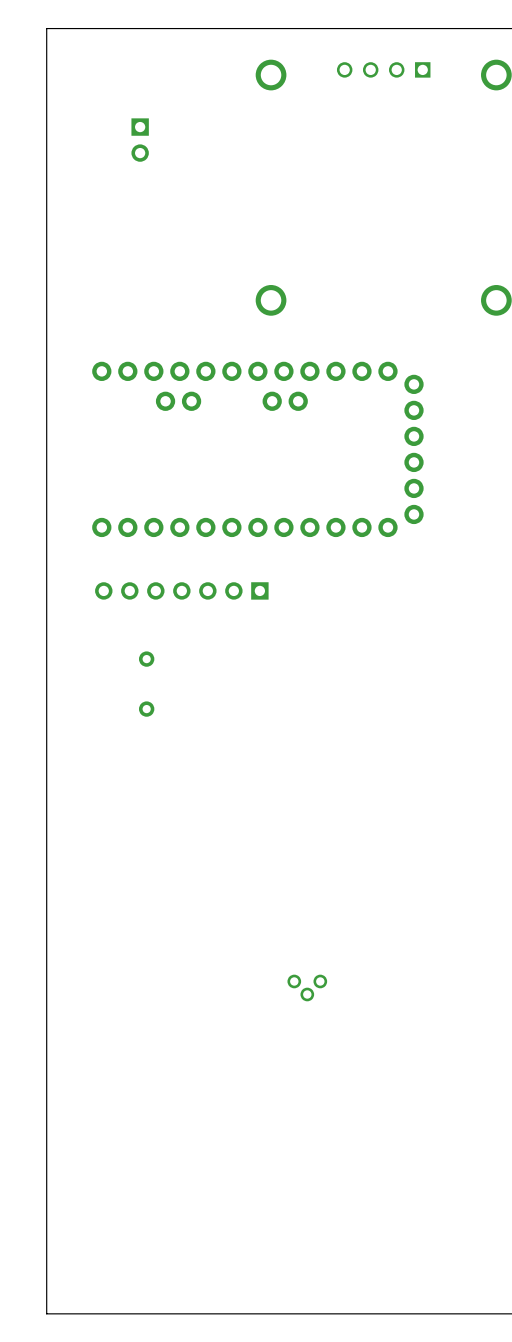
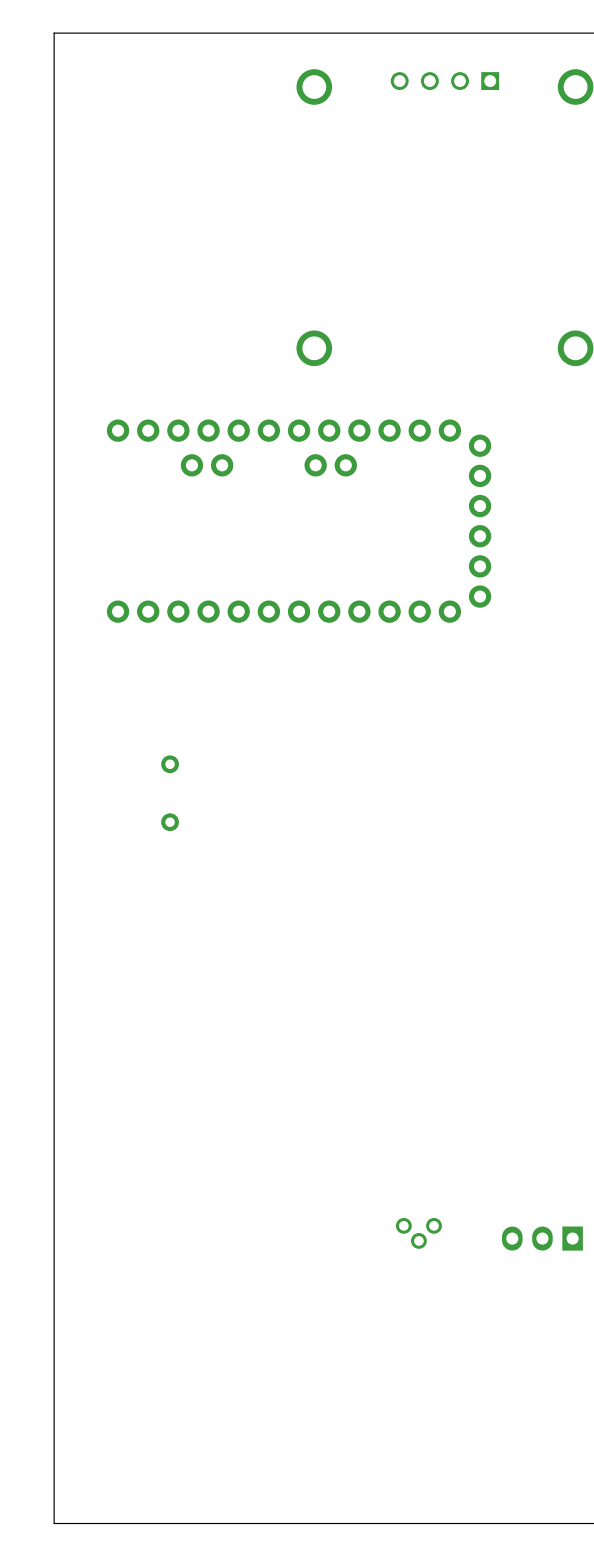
part: (140, 140) -> none
part: (181, 590) -> none
part position: (307, 987) -> (418, 1233)
part: none -> (542, 1238)

